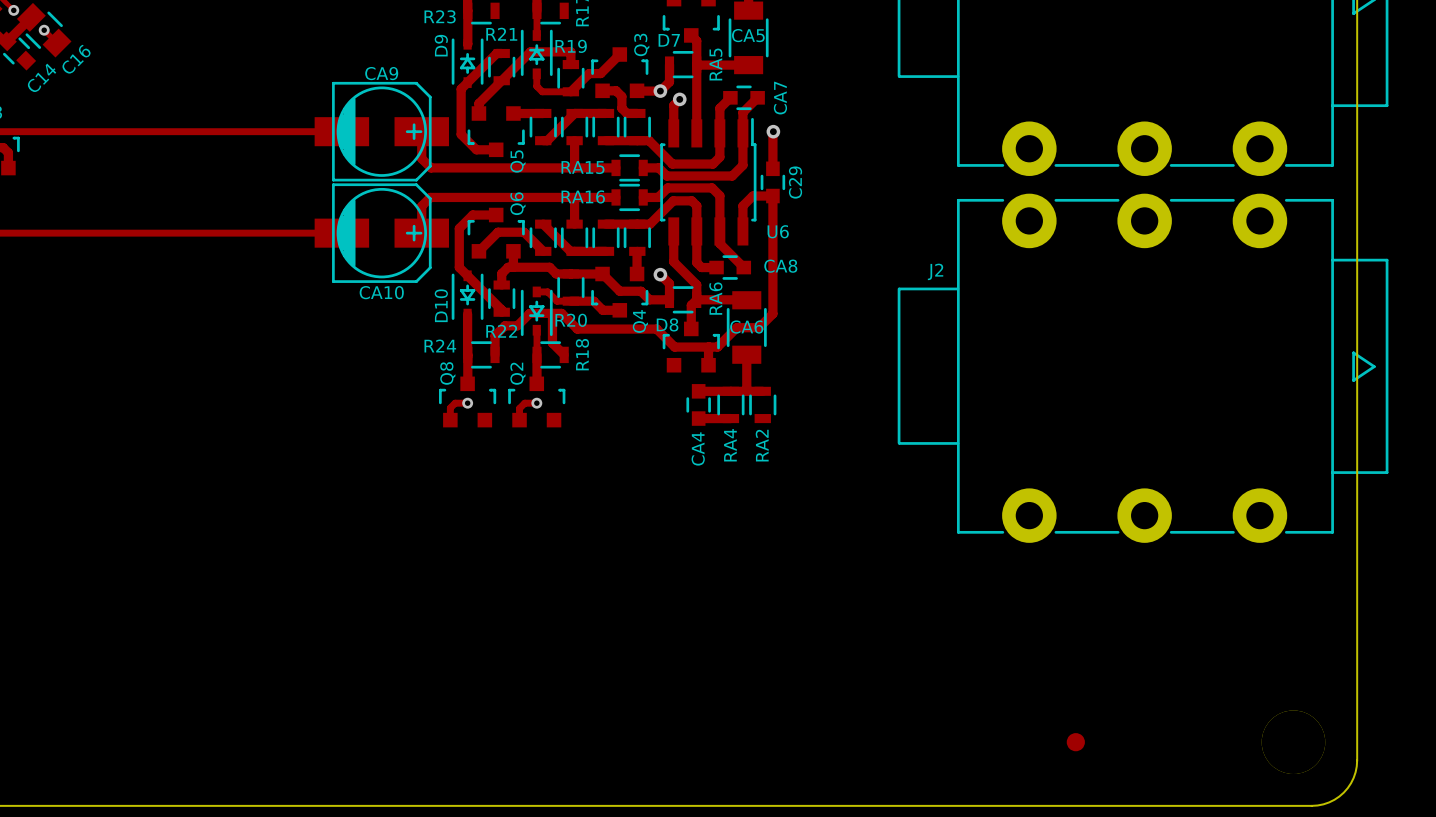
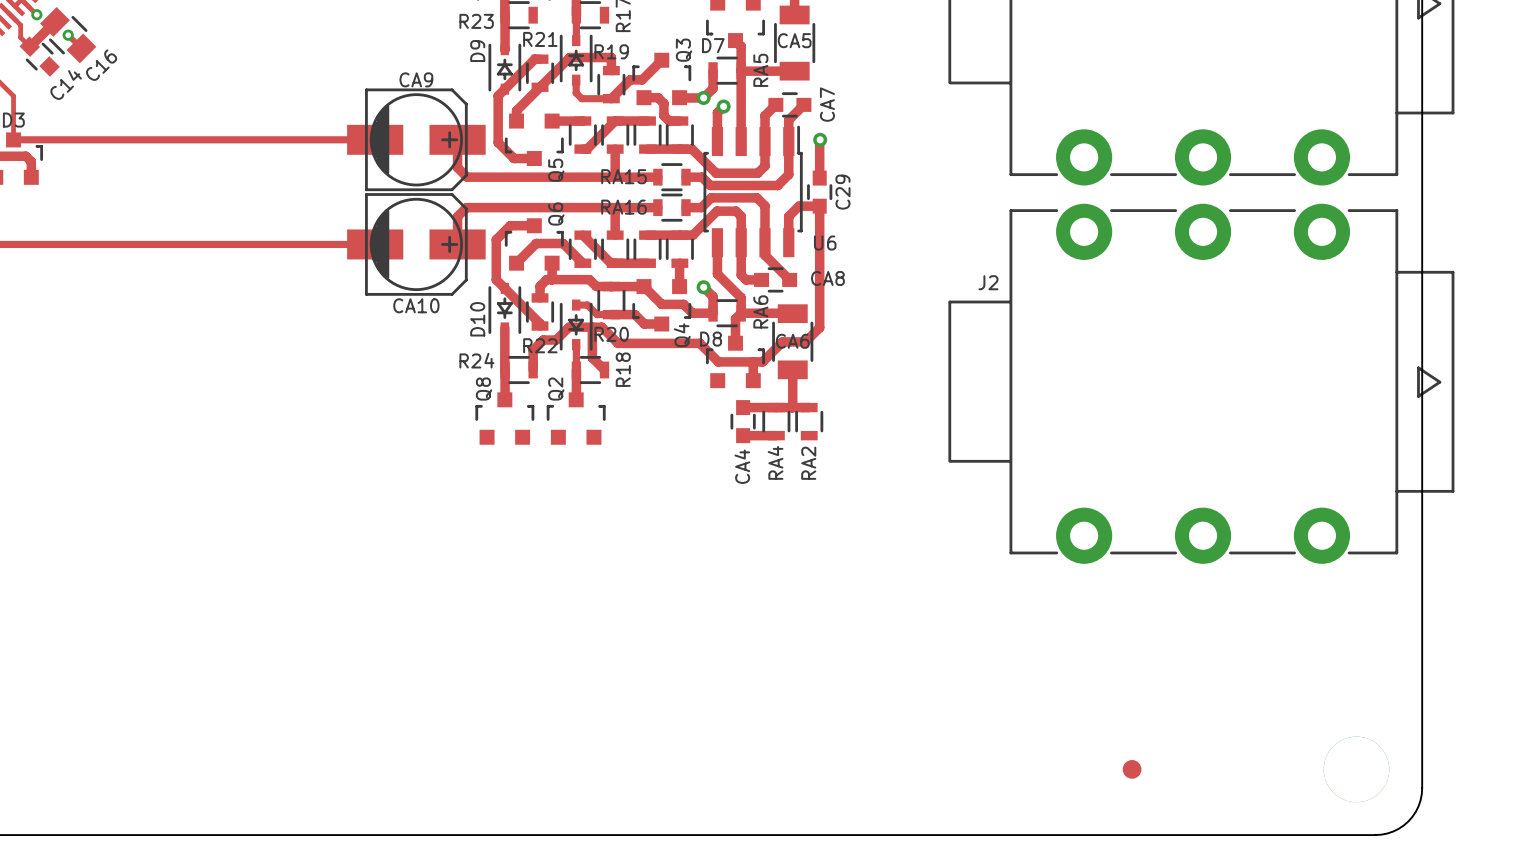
track: (467, 403) (455, 403) (450, 408) (450, 420) -> none
via: (467, 403) -> none
track: (536, 403) (524, 403) (519, 408) (519, 420) -> none
via: (536, 403) -> none

